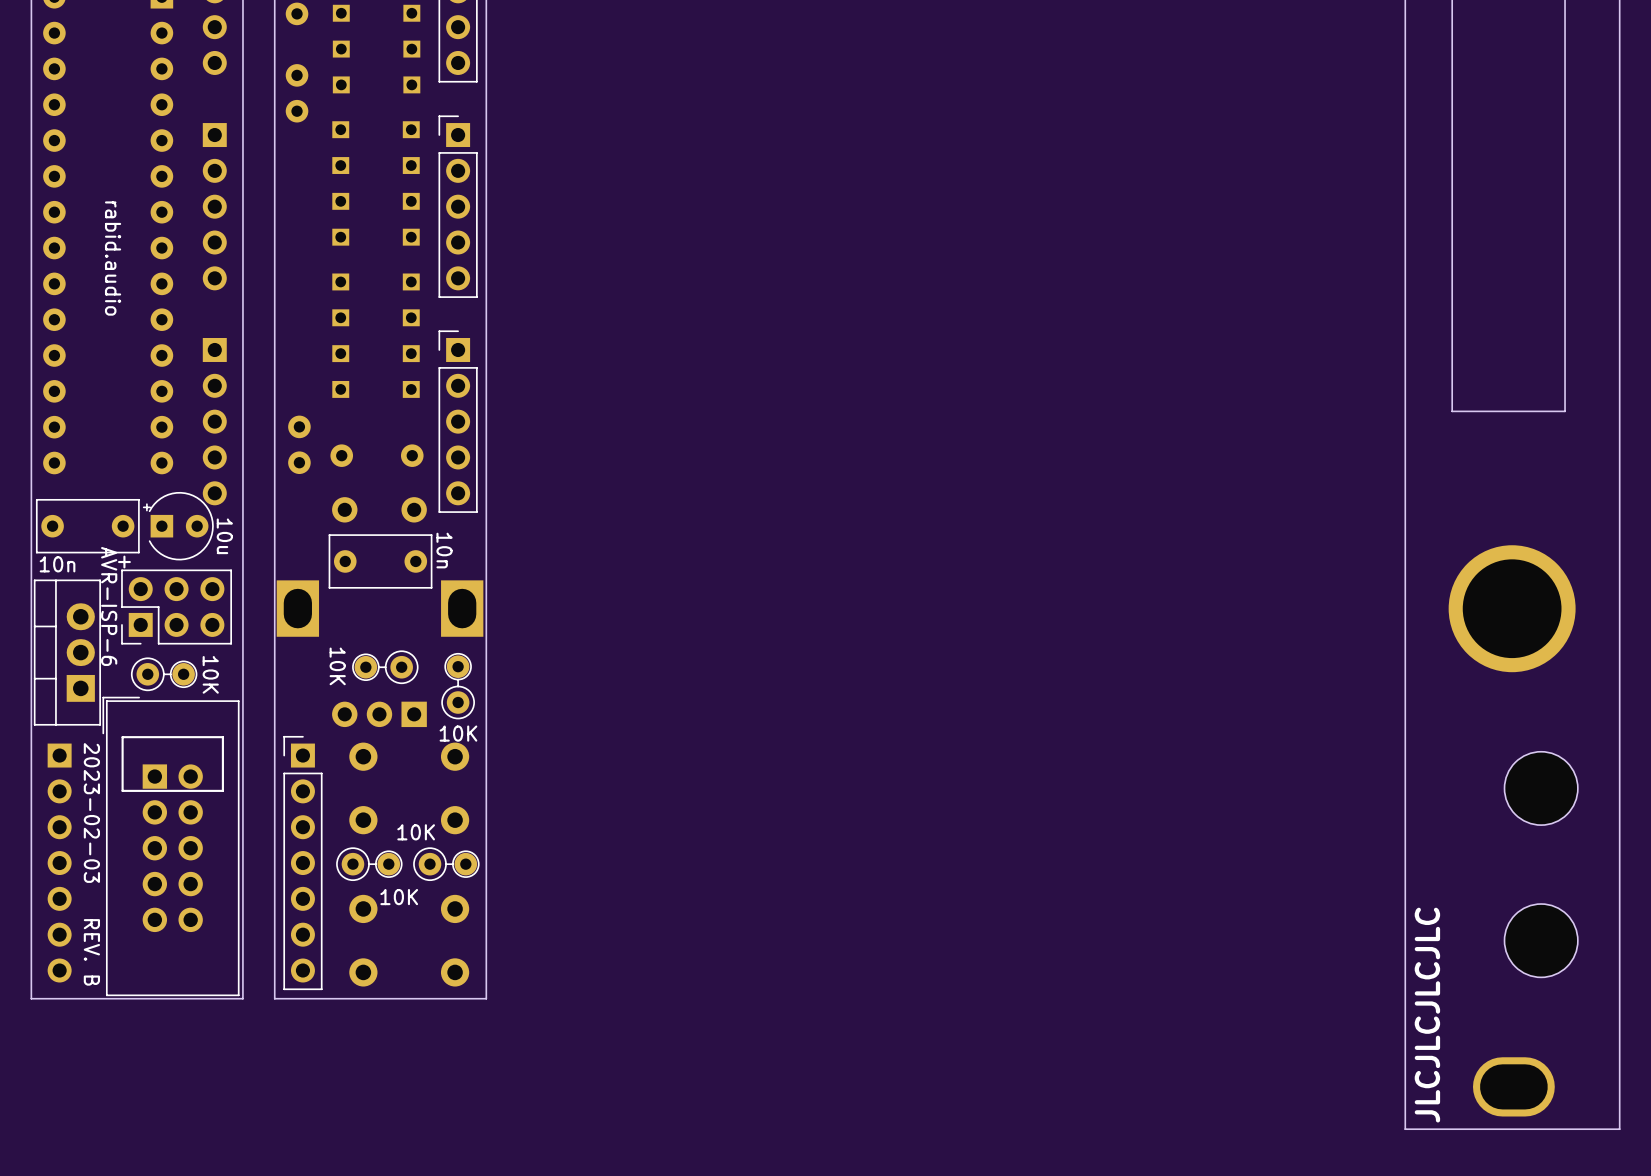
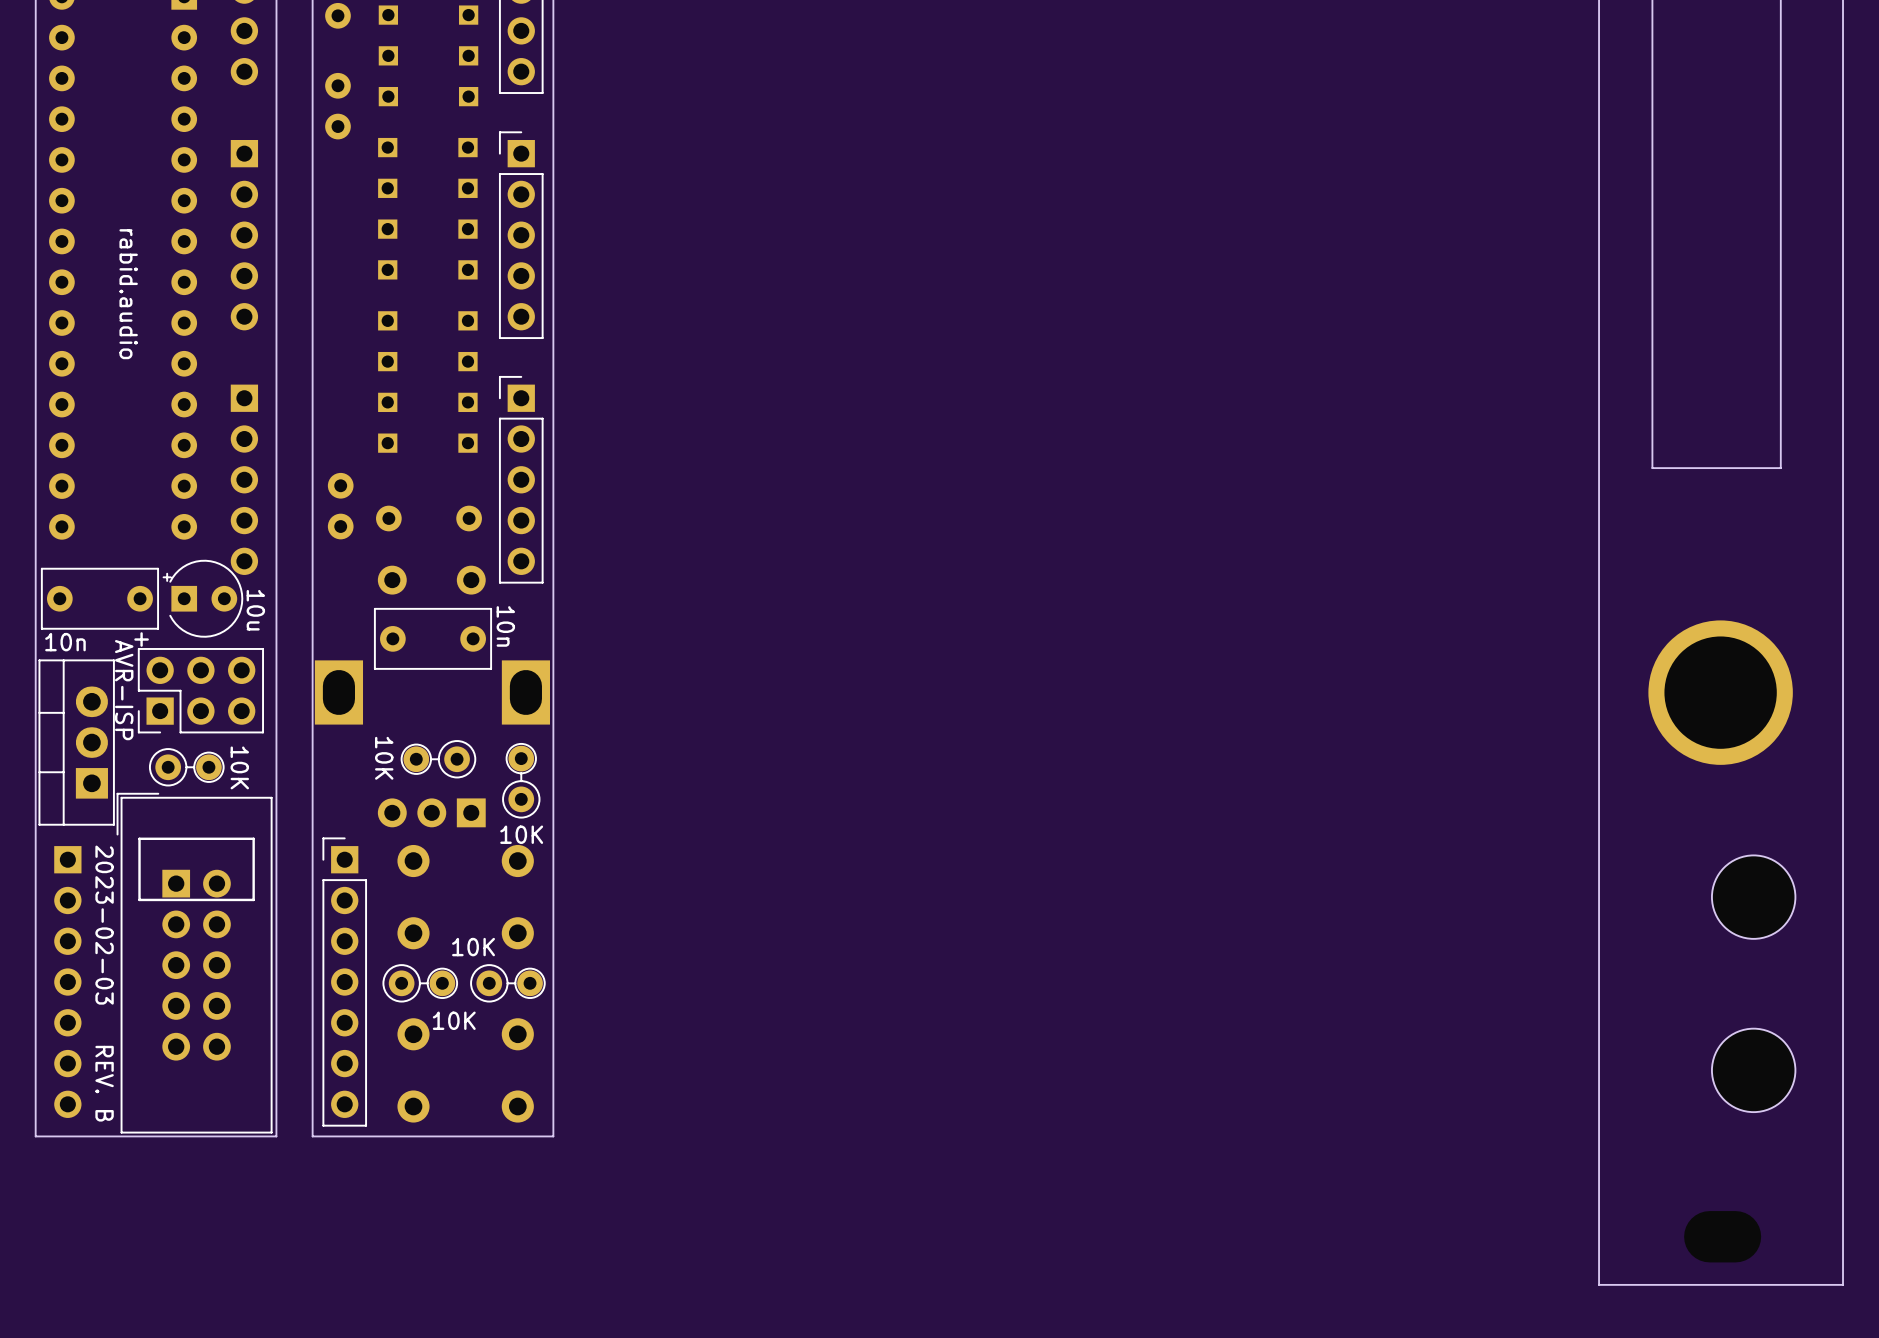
part value: AVR-ISP-6 (109, 606) -> AVR-ISP (124, 690)
text: JLCJLCJLCJLC (1427, 1015) -> none
part footprint: [1472, 1057, 1555, 1117] -> [1684, 1211, 1762, 1263]

